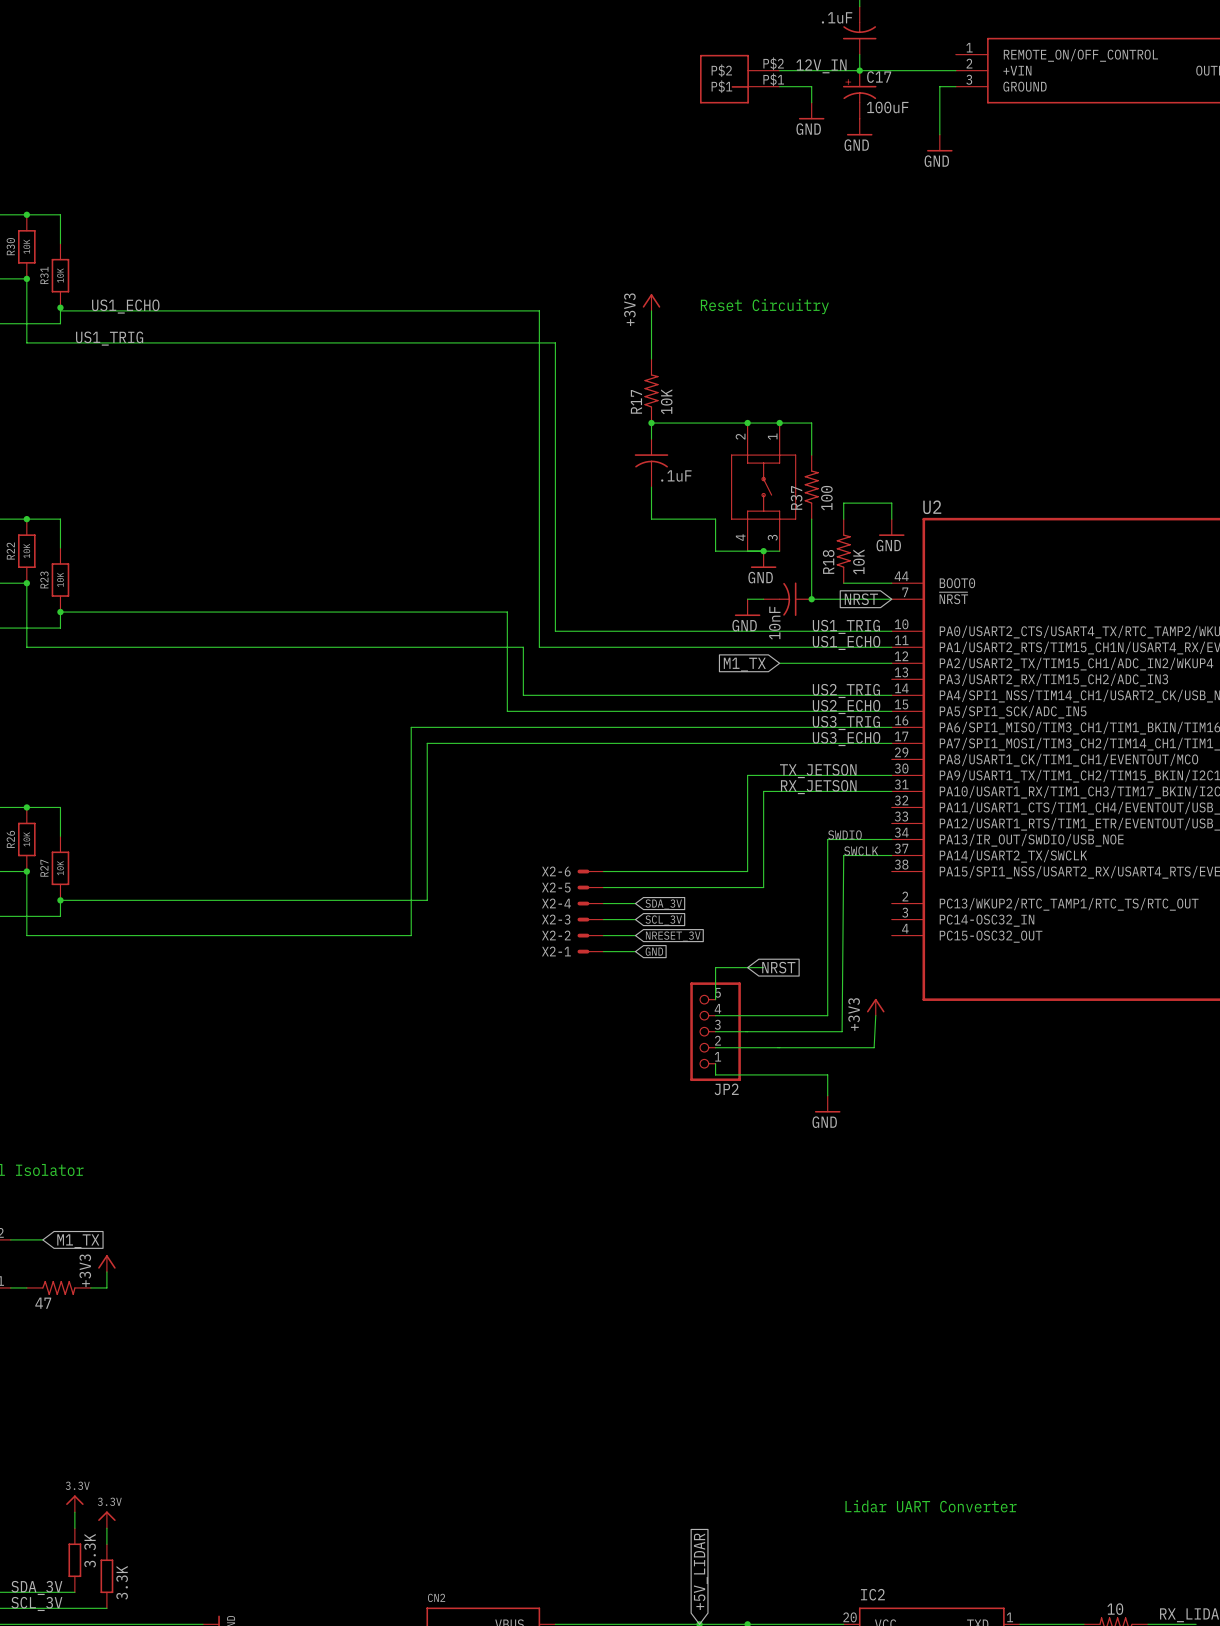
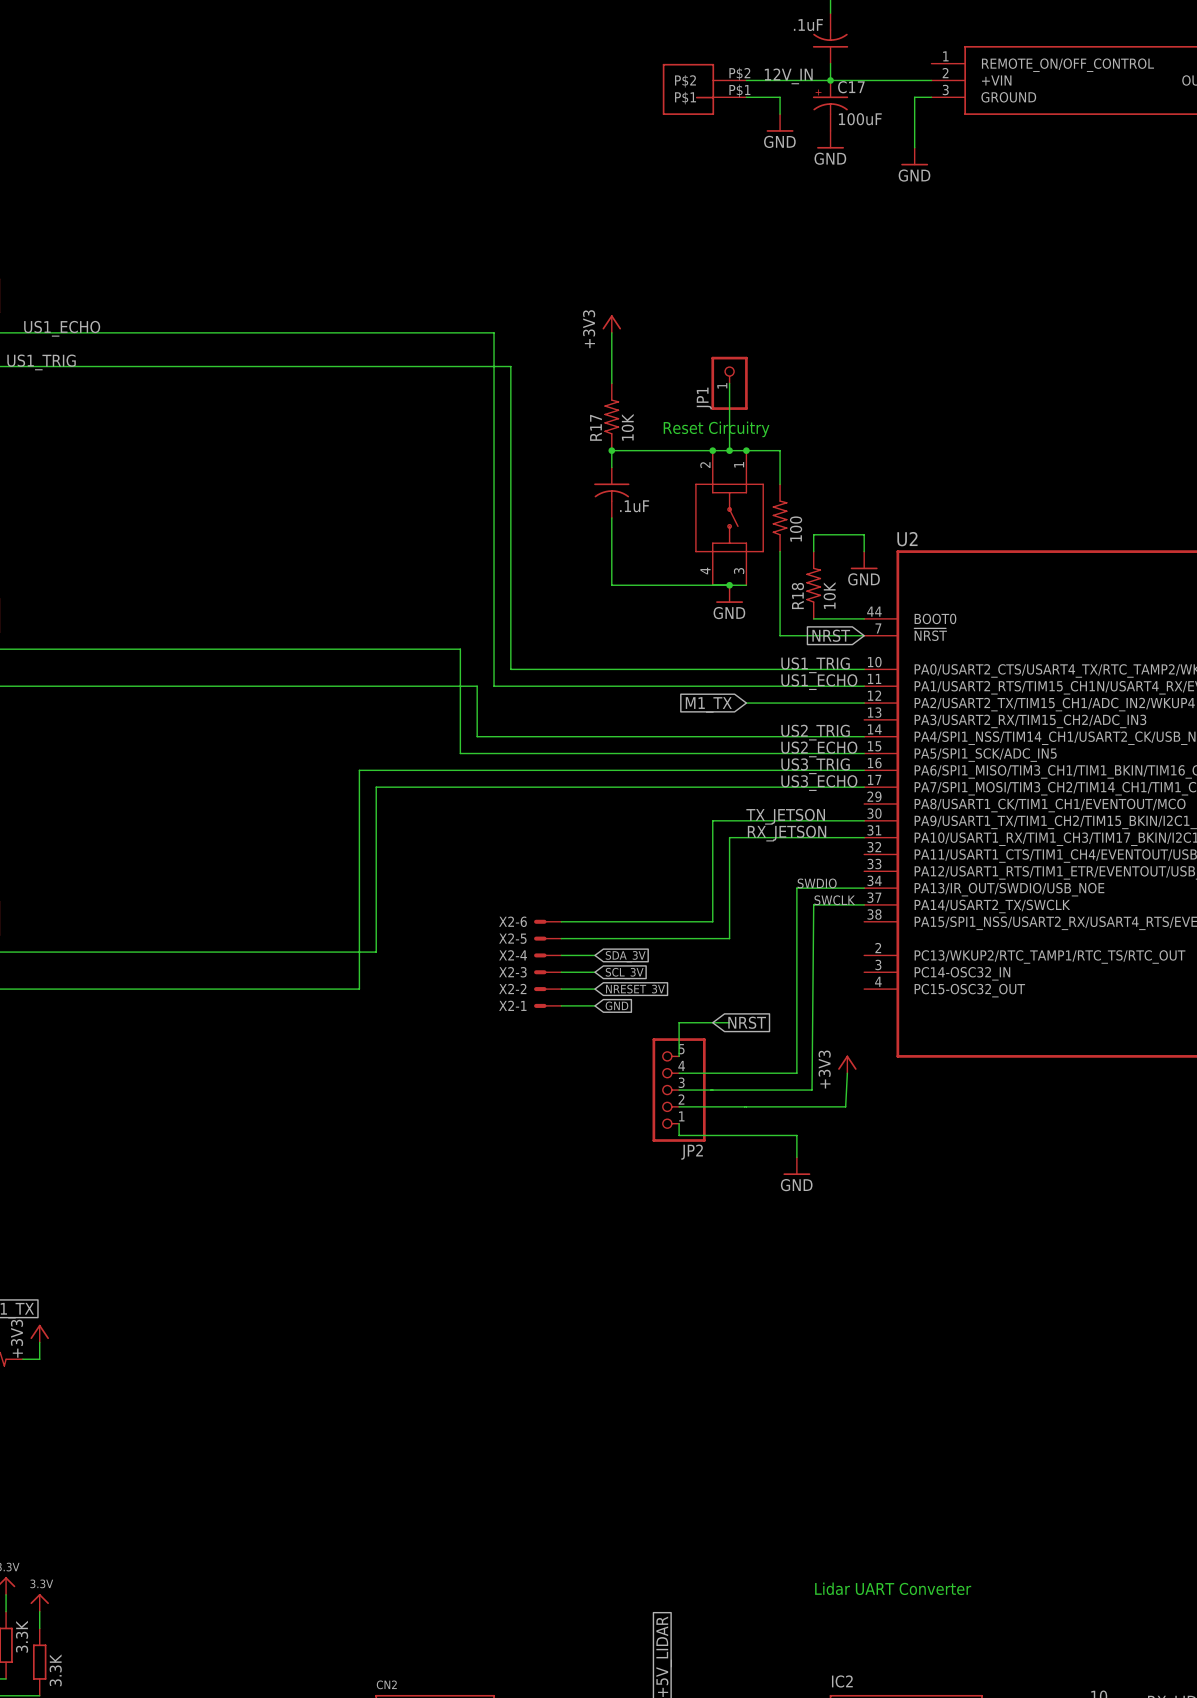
text position: Reset Circuitry (764, 306) -> Reset Circuitry (716, 429)
wire: none -> (729, 383) (729, 450)
JP1: none -> (729, 383)
junction: none -> (729, 450)
R37 name: R37 (796, 497) -> none
wire: (651, 519) (715, 519) (715, 551) -> (611, 551) (611, 585) (679, 585)
wire: (747, 599) (763, 599) -> none
part: 10nF (787, 599) -> none
junction: (811, 599) -> none
power symbol: GND (747, 607) -> none

